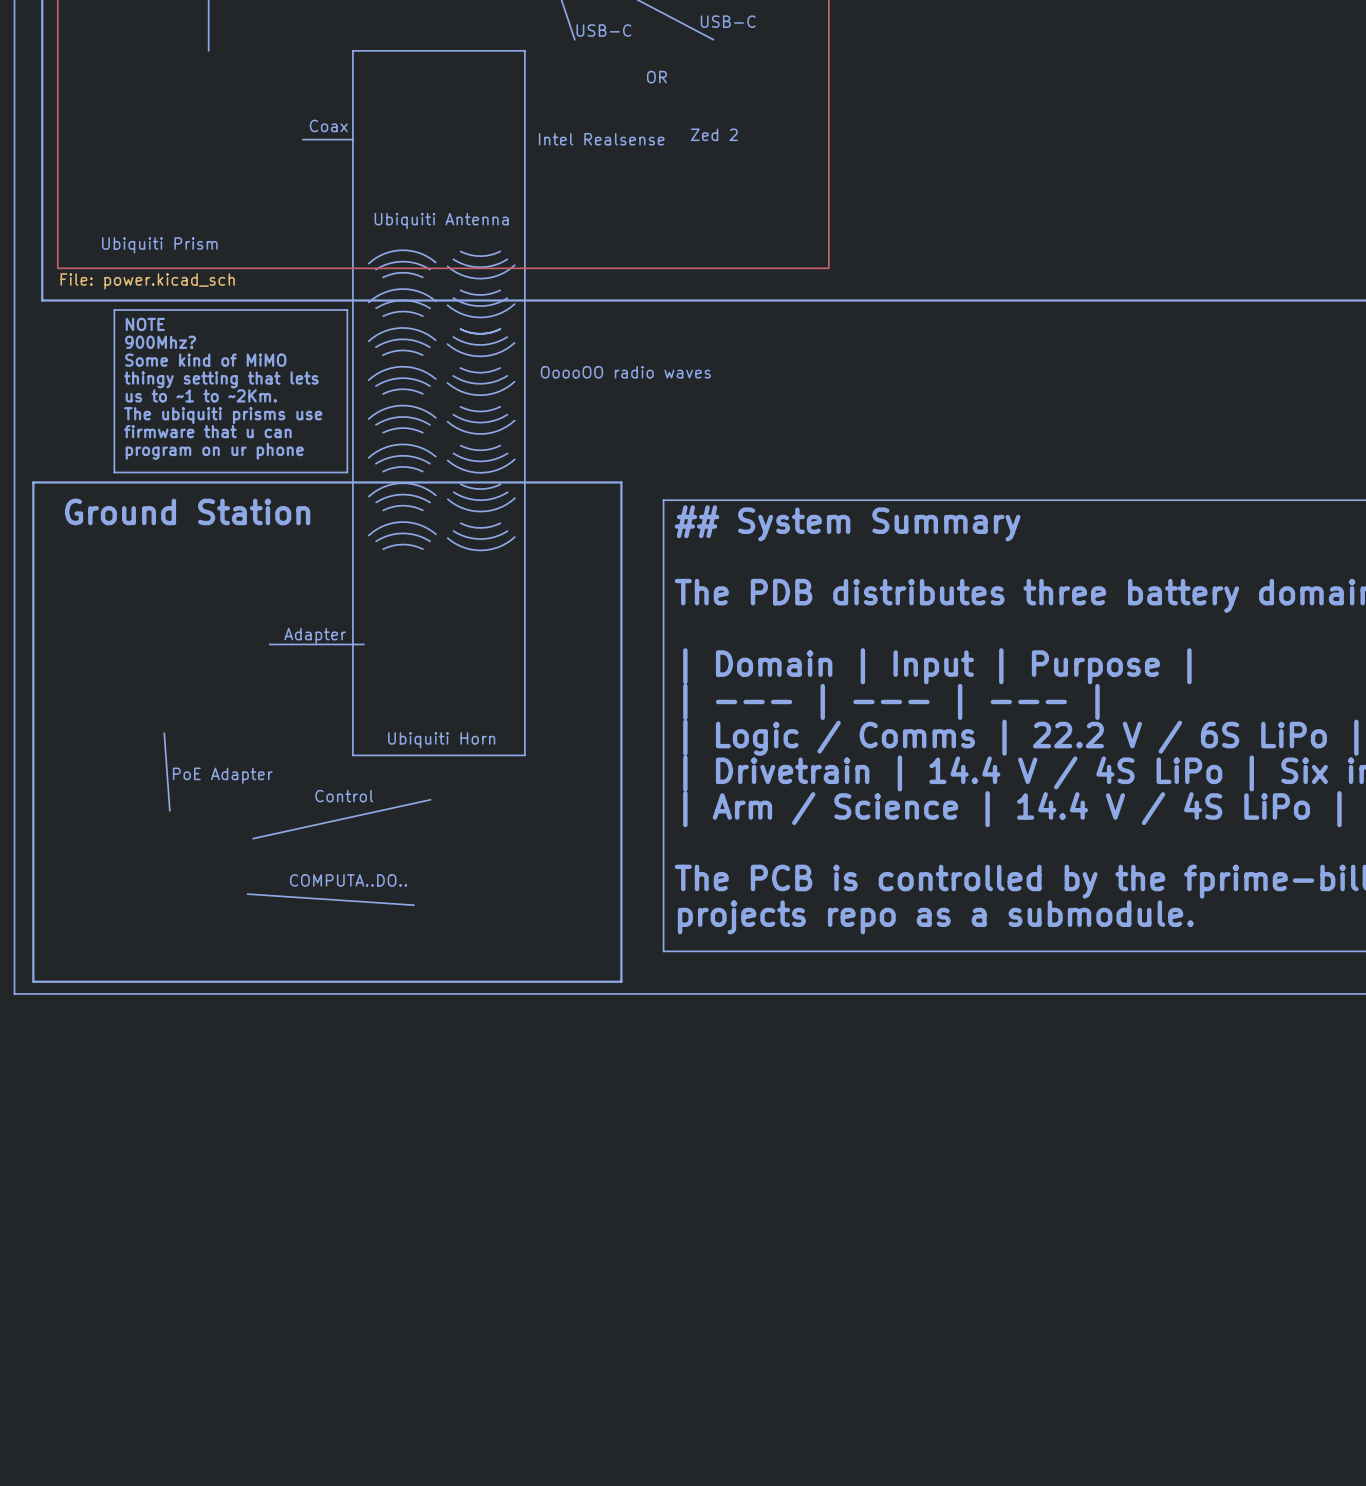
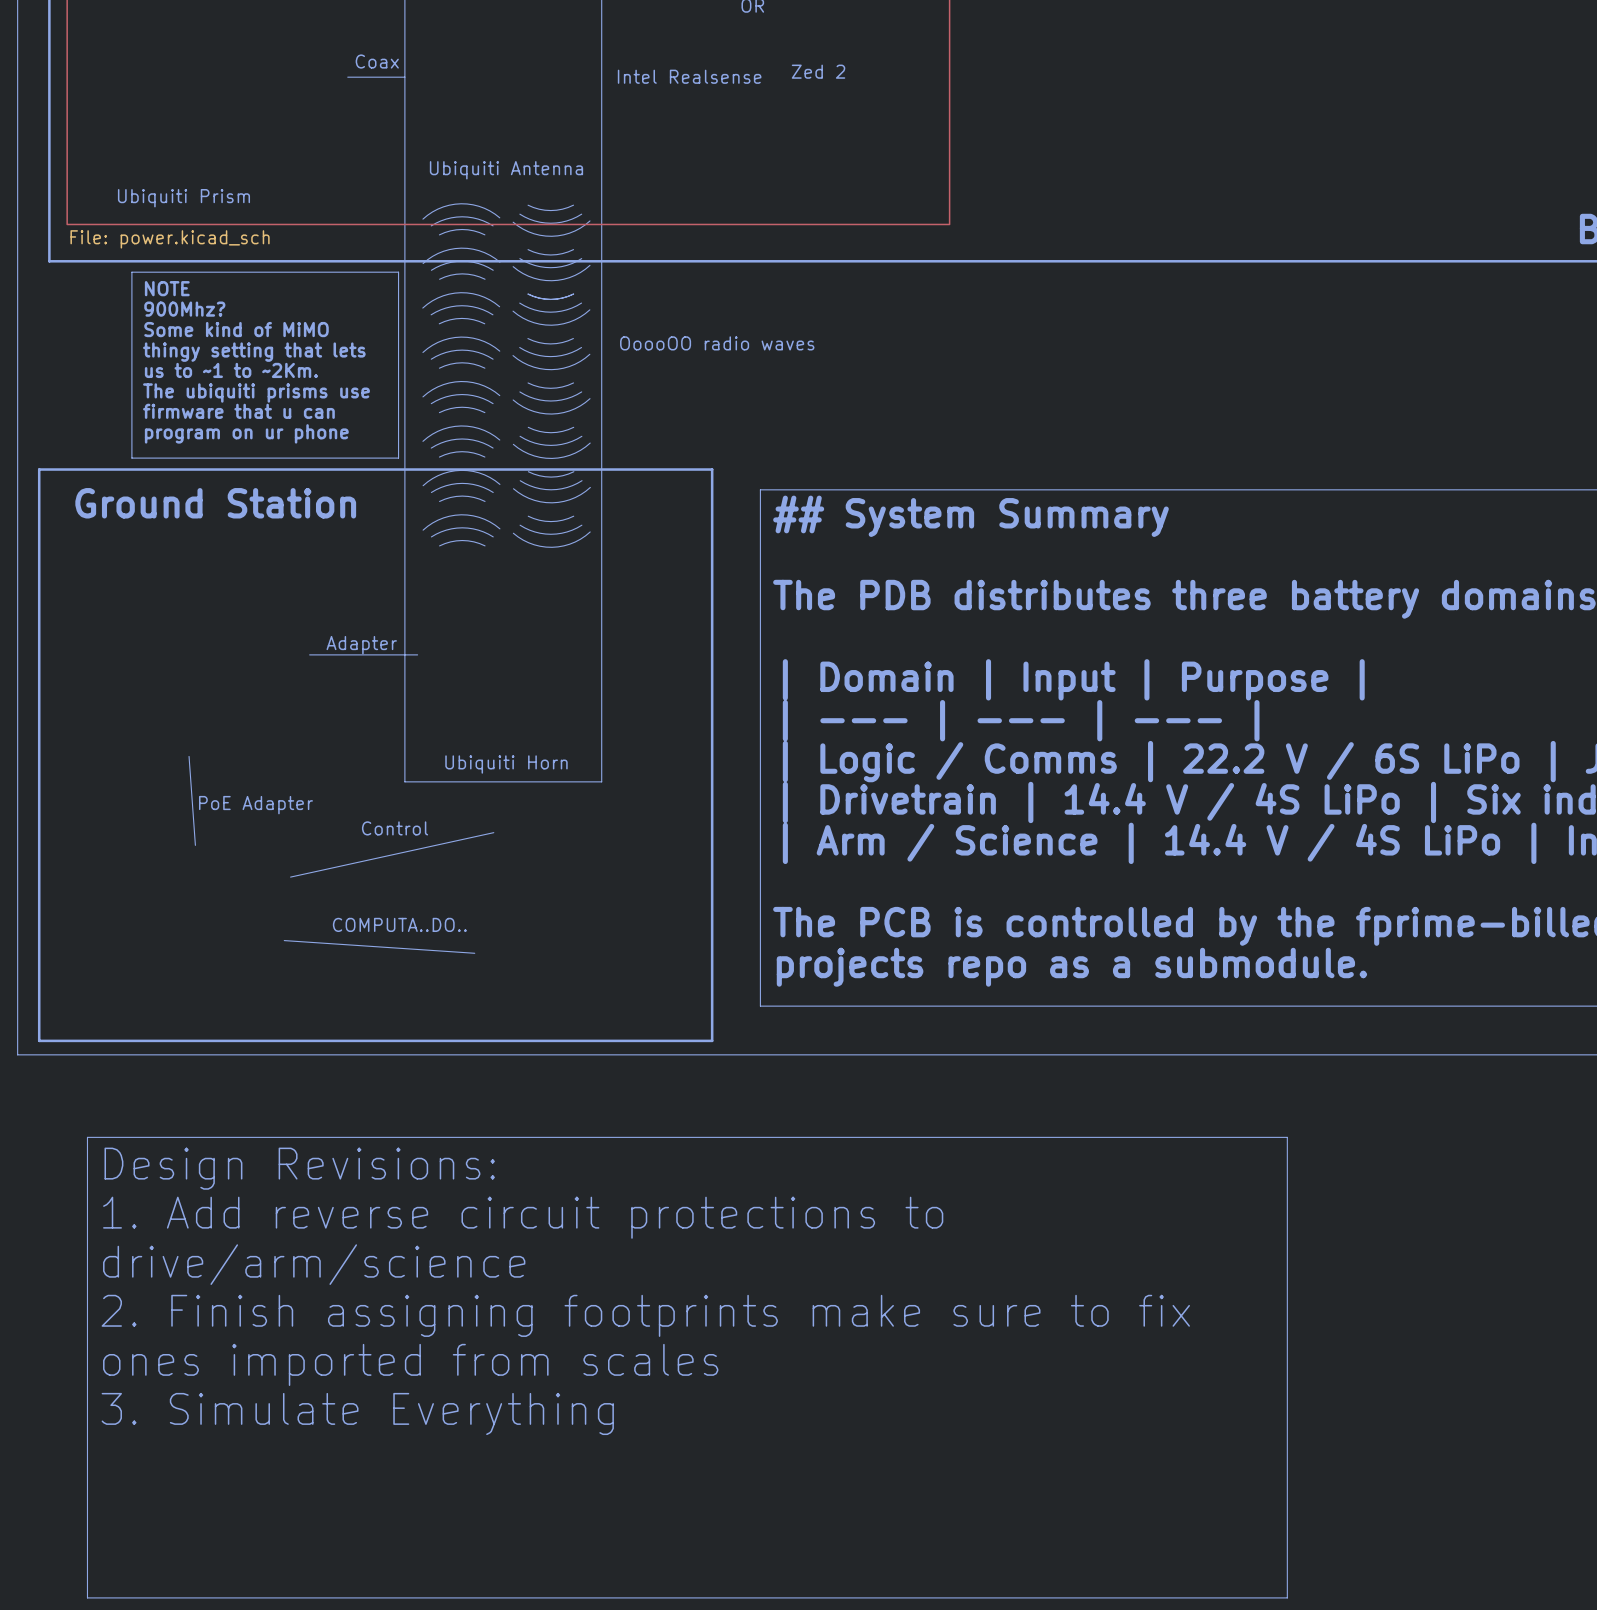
line: none -> (87, 1137) (1287, 1137) (1287, 1597) (87, 1597) (87, 1137)
text: none -> Design Revisions: (299, 1168)
text: none -> 1. Add reverse circuit protections to (523, 1217)
text: none -> drive/arm/science (314, 1264)
text: none -> 2. Finish assigning footprints make sure to fix (645, 1315)
text: none -> ones imported from scales (410, 1364)
text: none -> 3. Simulate Everything (357, 1413)

